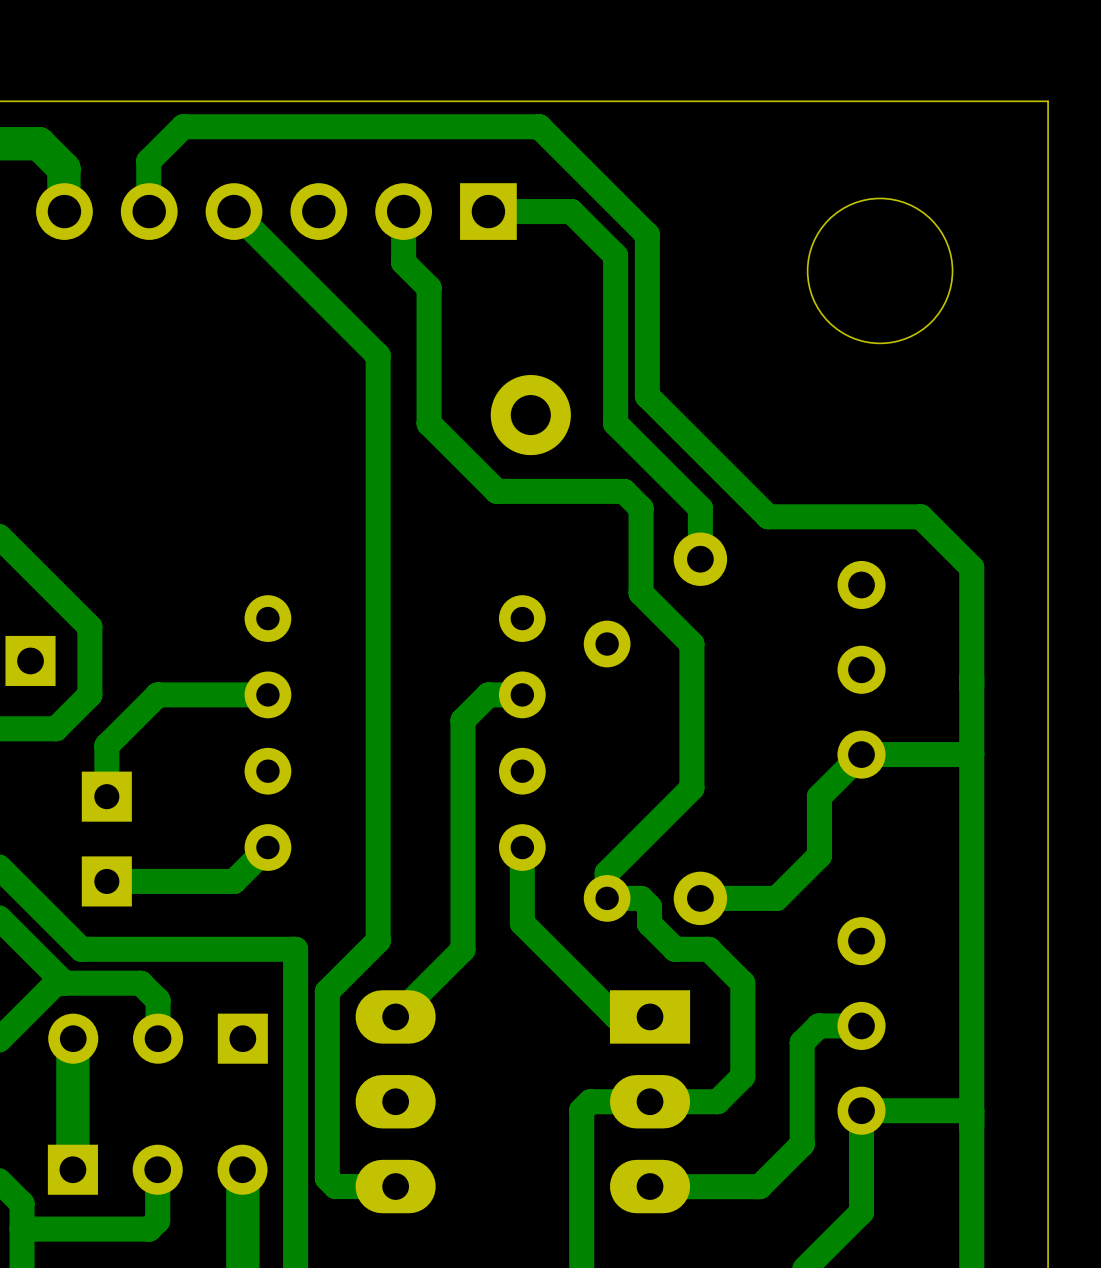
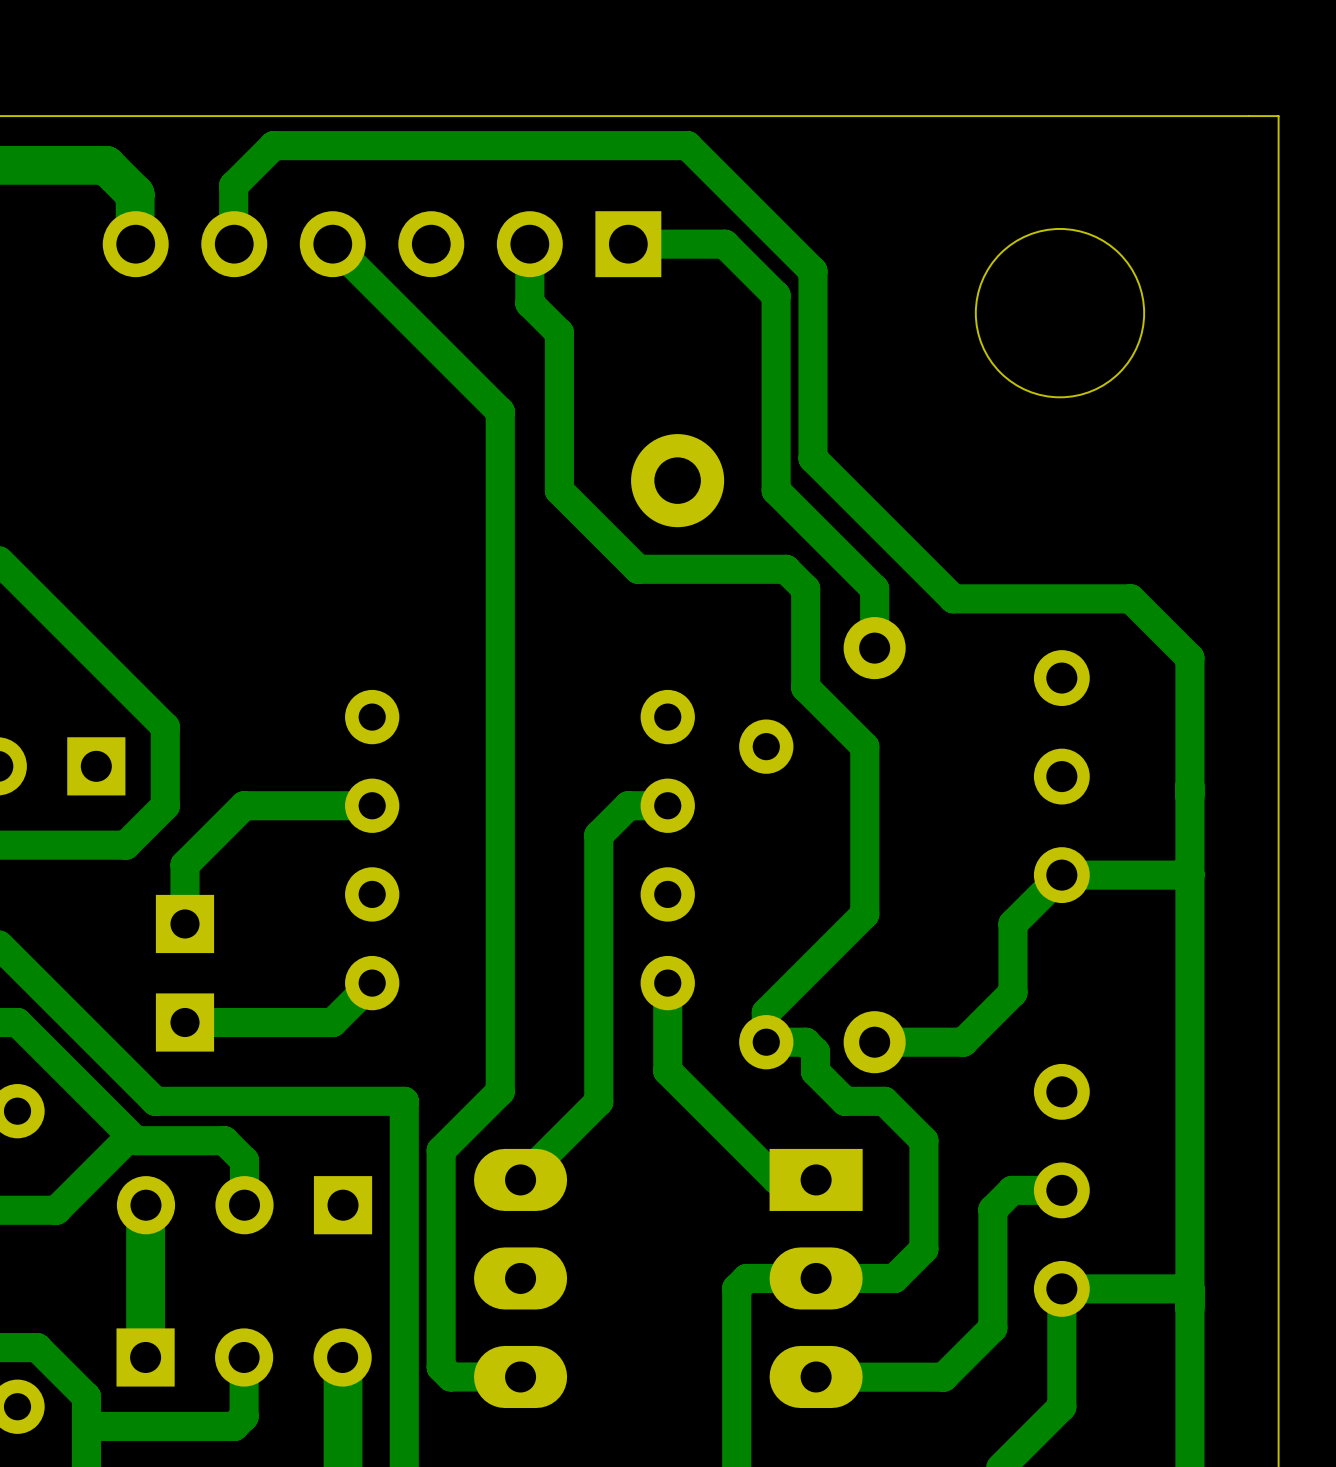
round board edge position: (880, 270) -> (1059, 313)

